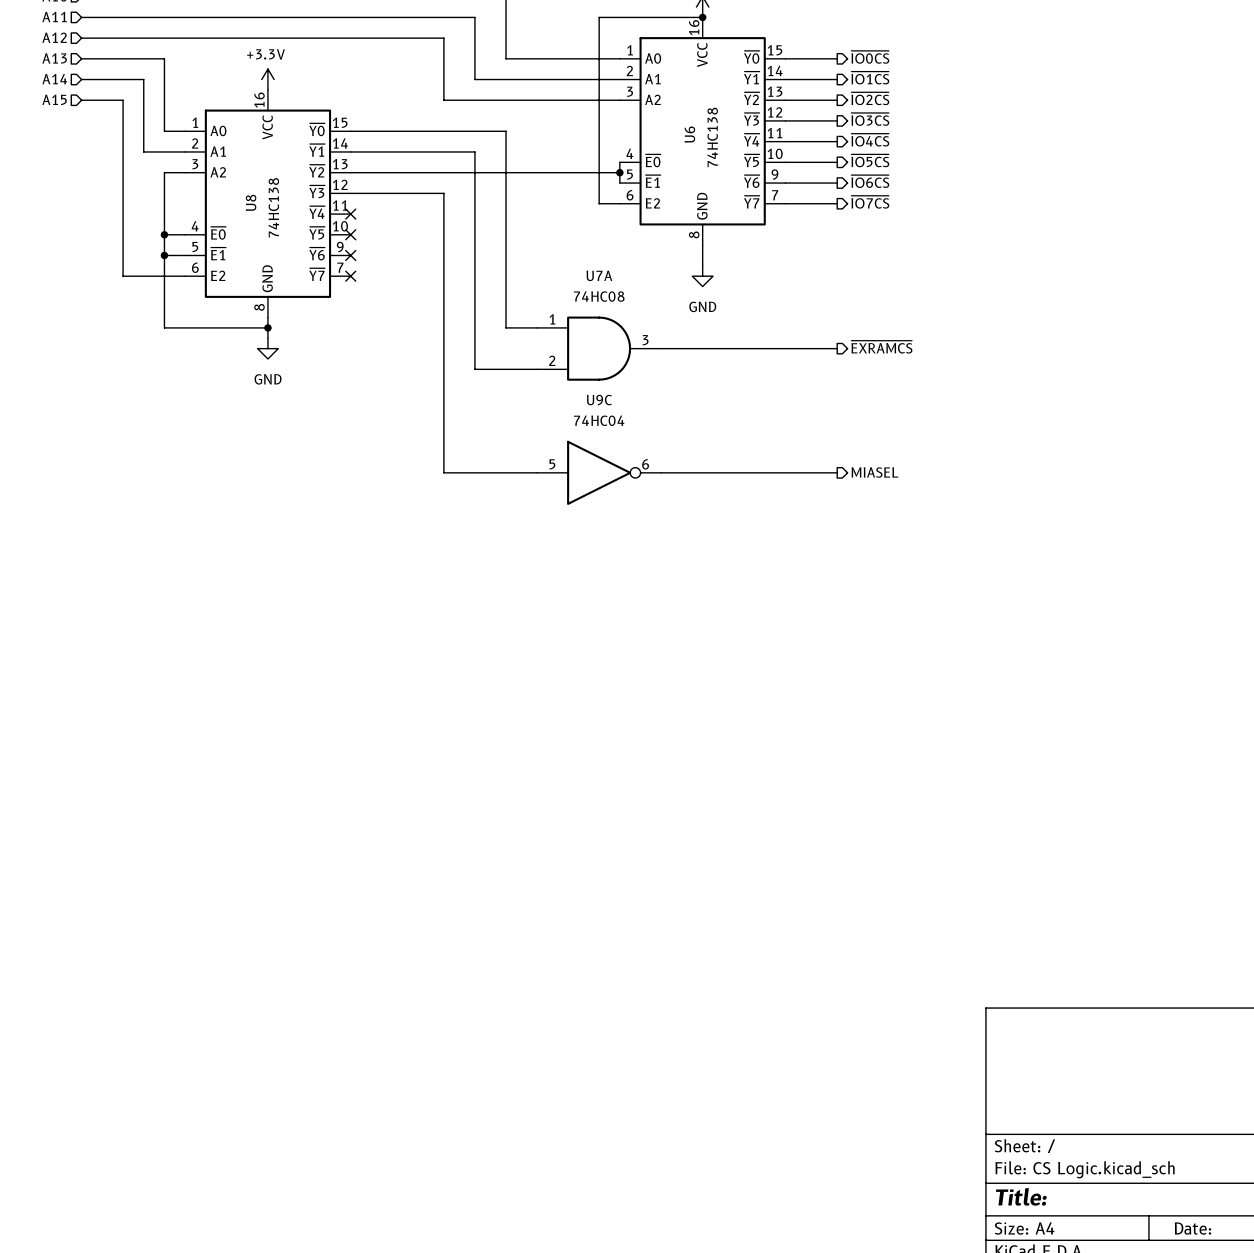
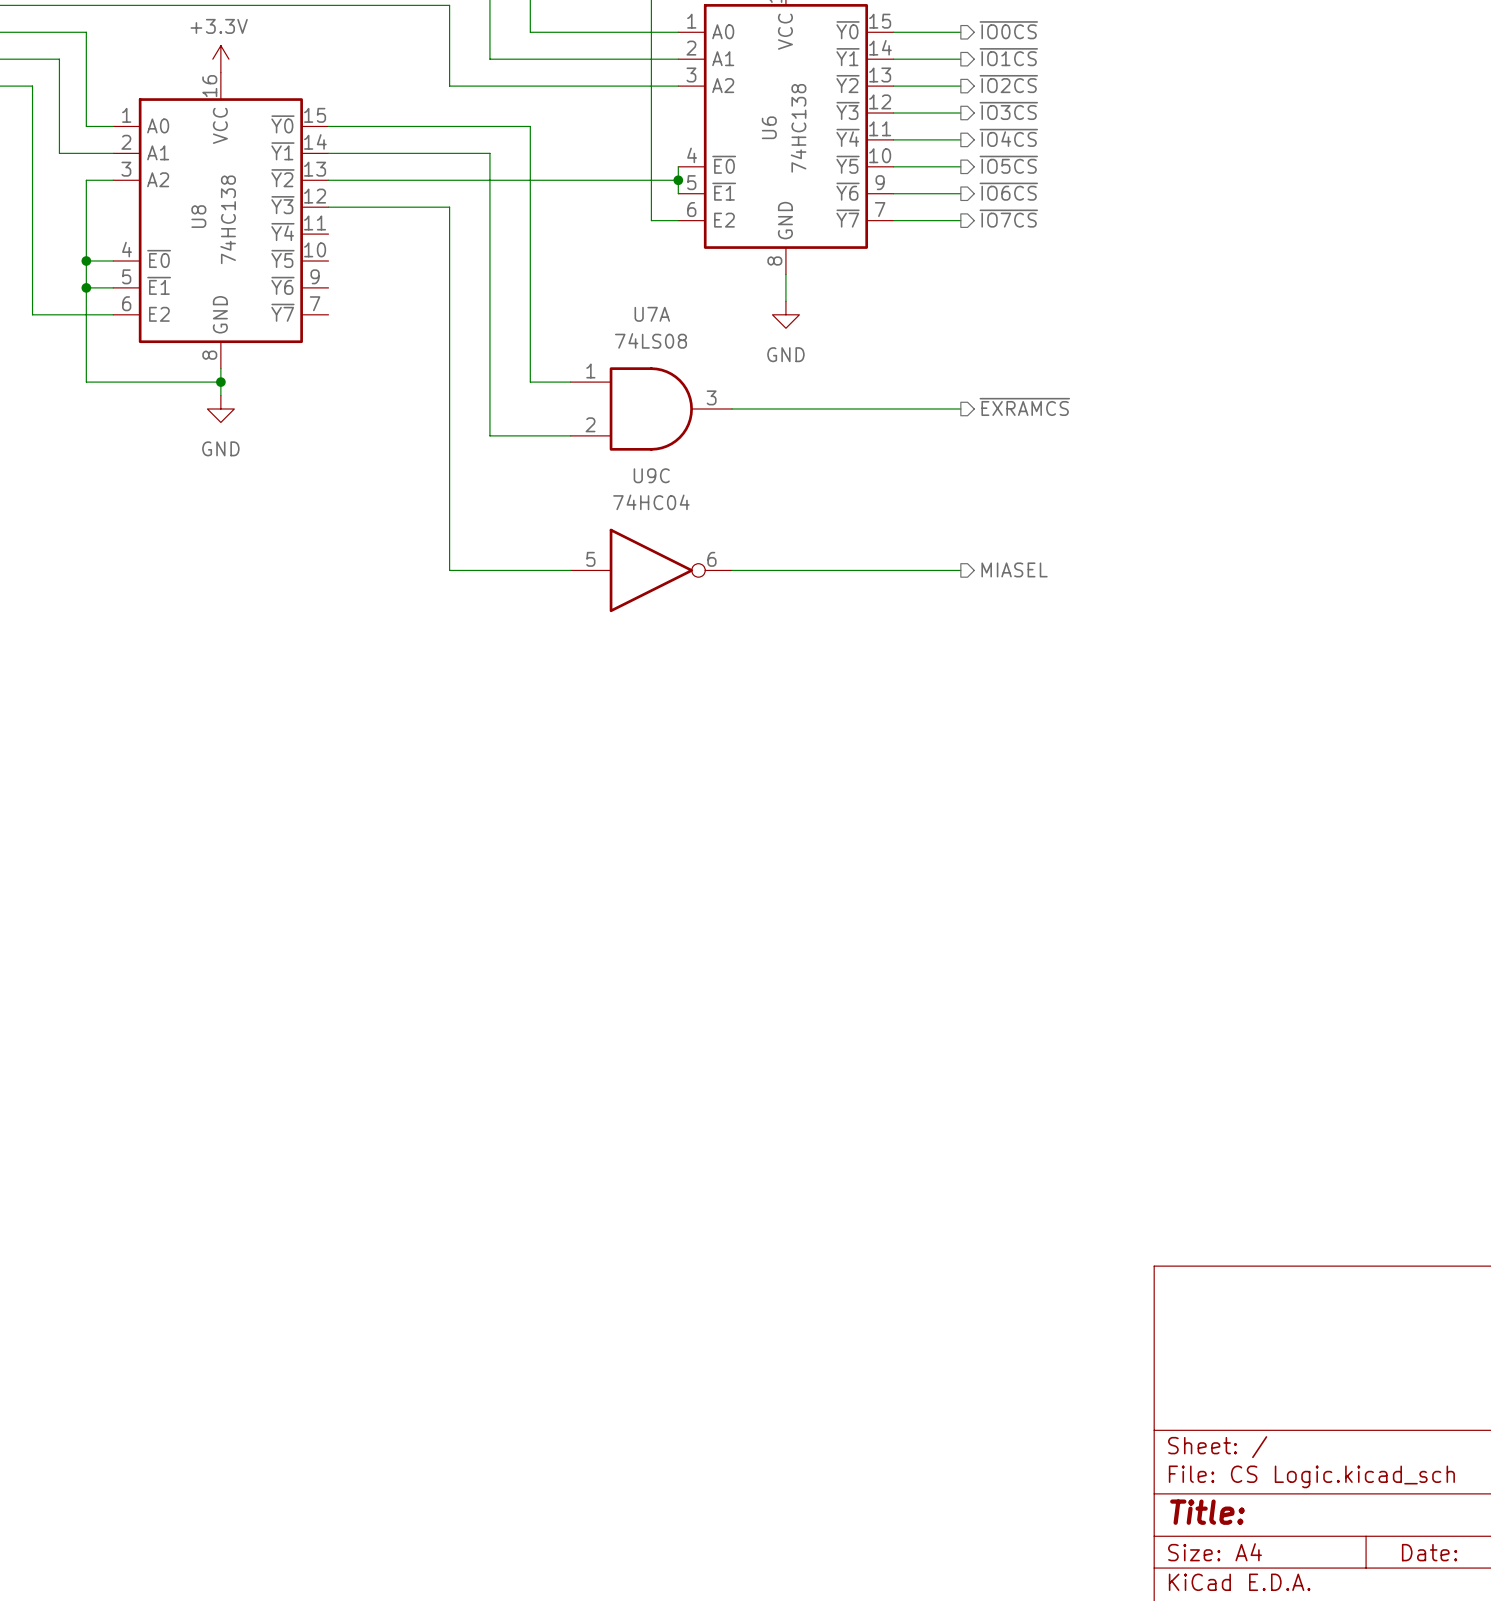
no-connect mark: (350, 214) -> none
no-connect mark: (350, 234) -> none
no-connect mark: (350, 255) -> none
no-connect mark: (350, 276) -> none
U7A value: 74HC08 (599, 296) -> 74LS08 (651, 340)

